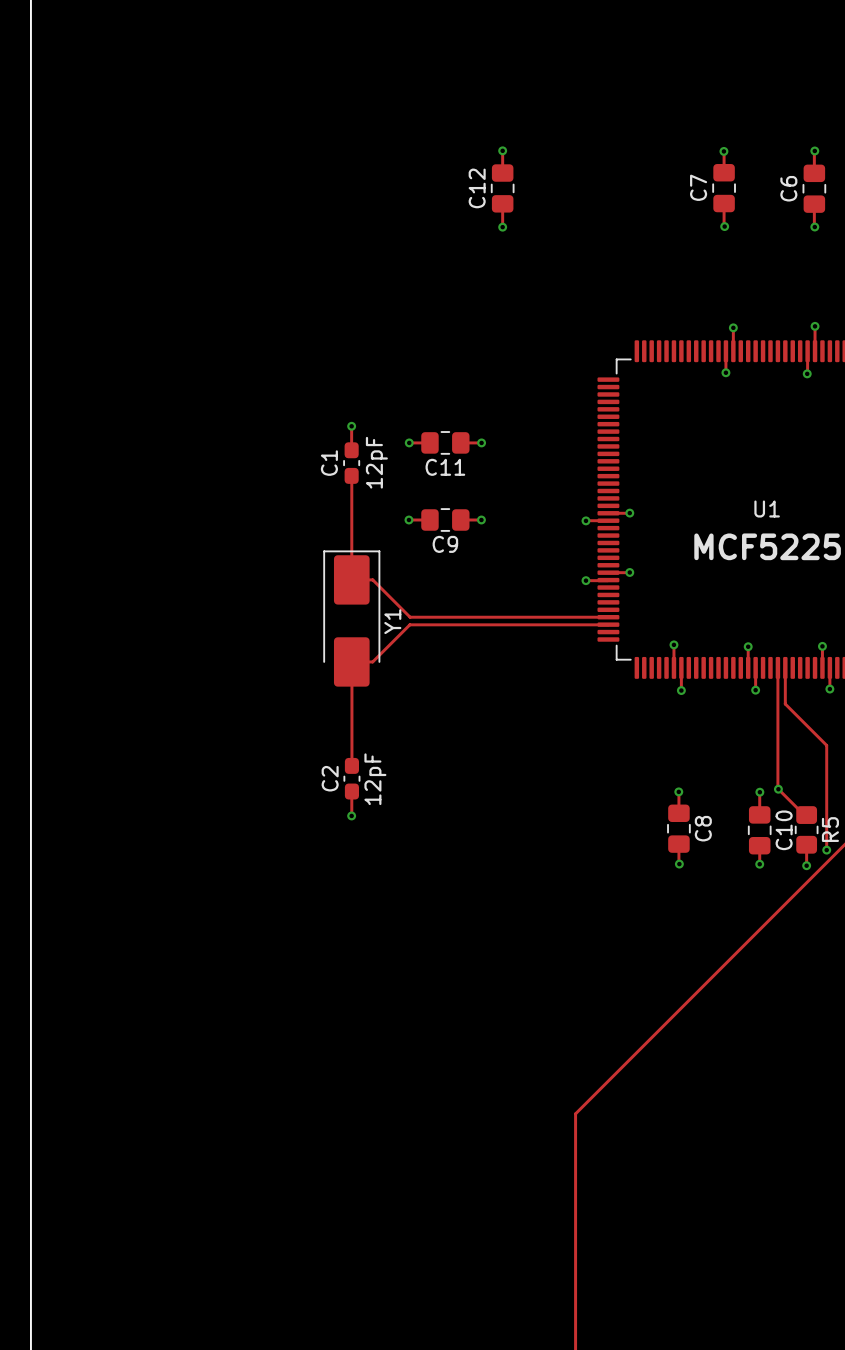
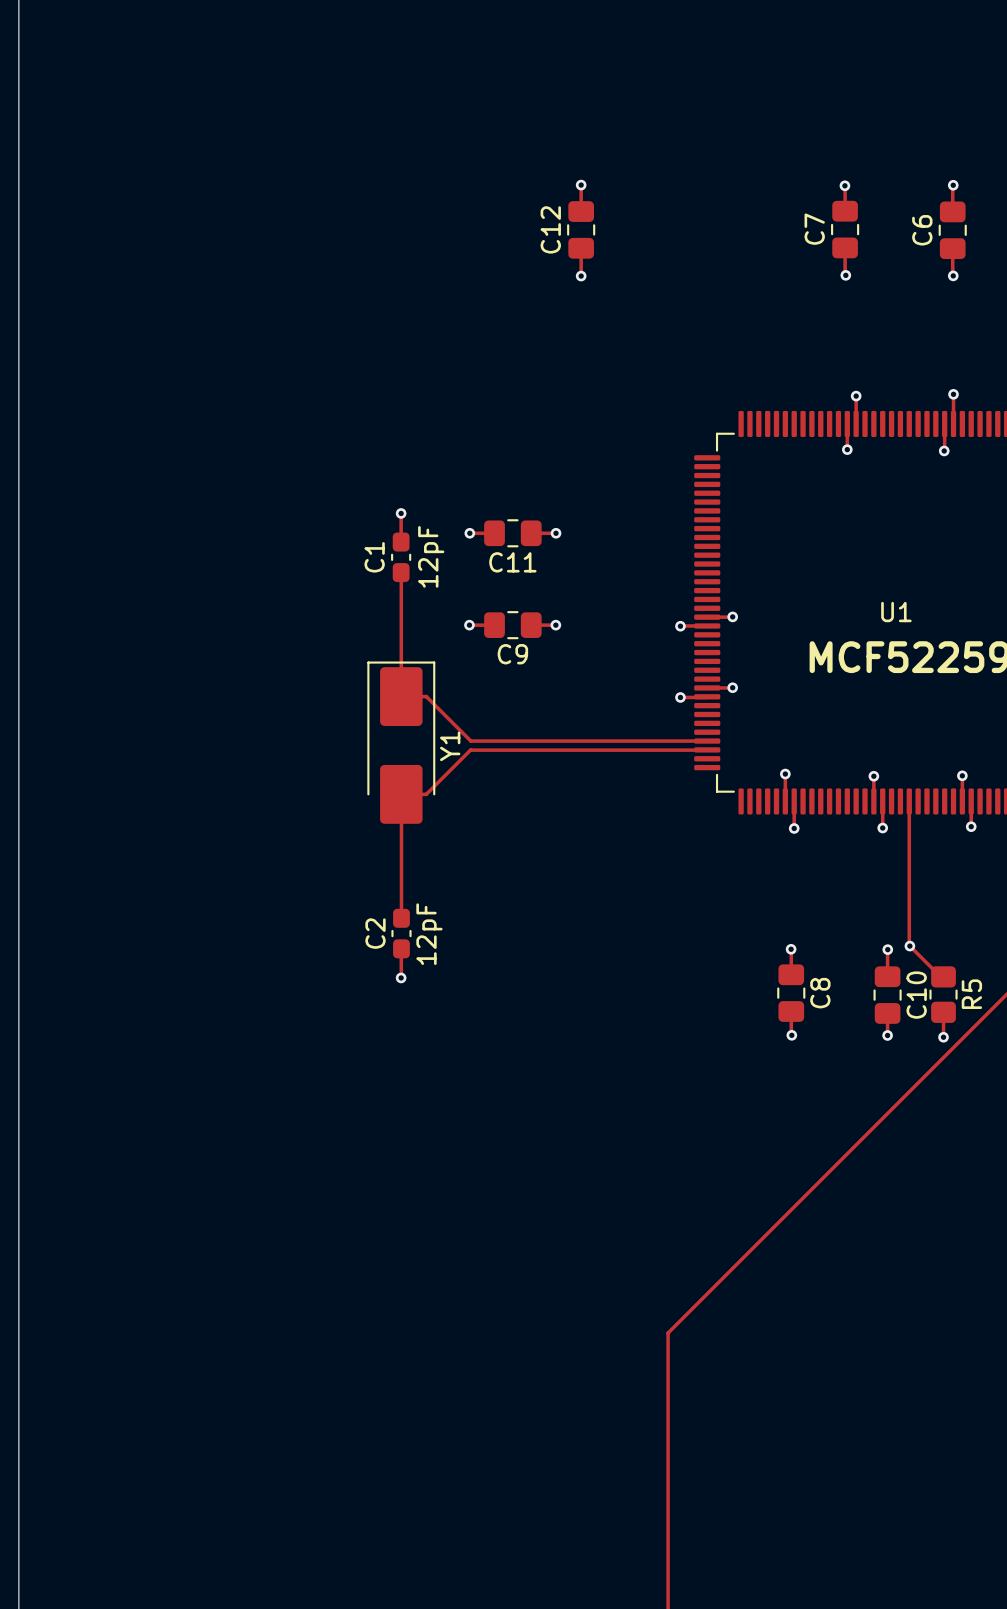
track: (785, 667) (785, 703) -> none
track: (785, 703) (826, 745) (826, 850) -> none
via: (826, 850) -> none

